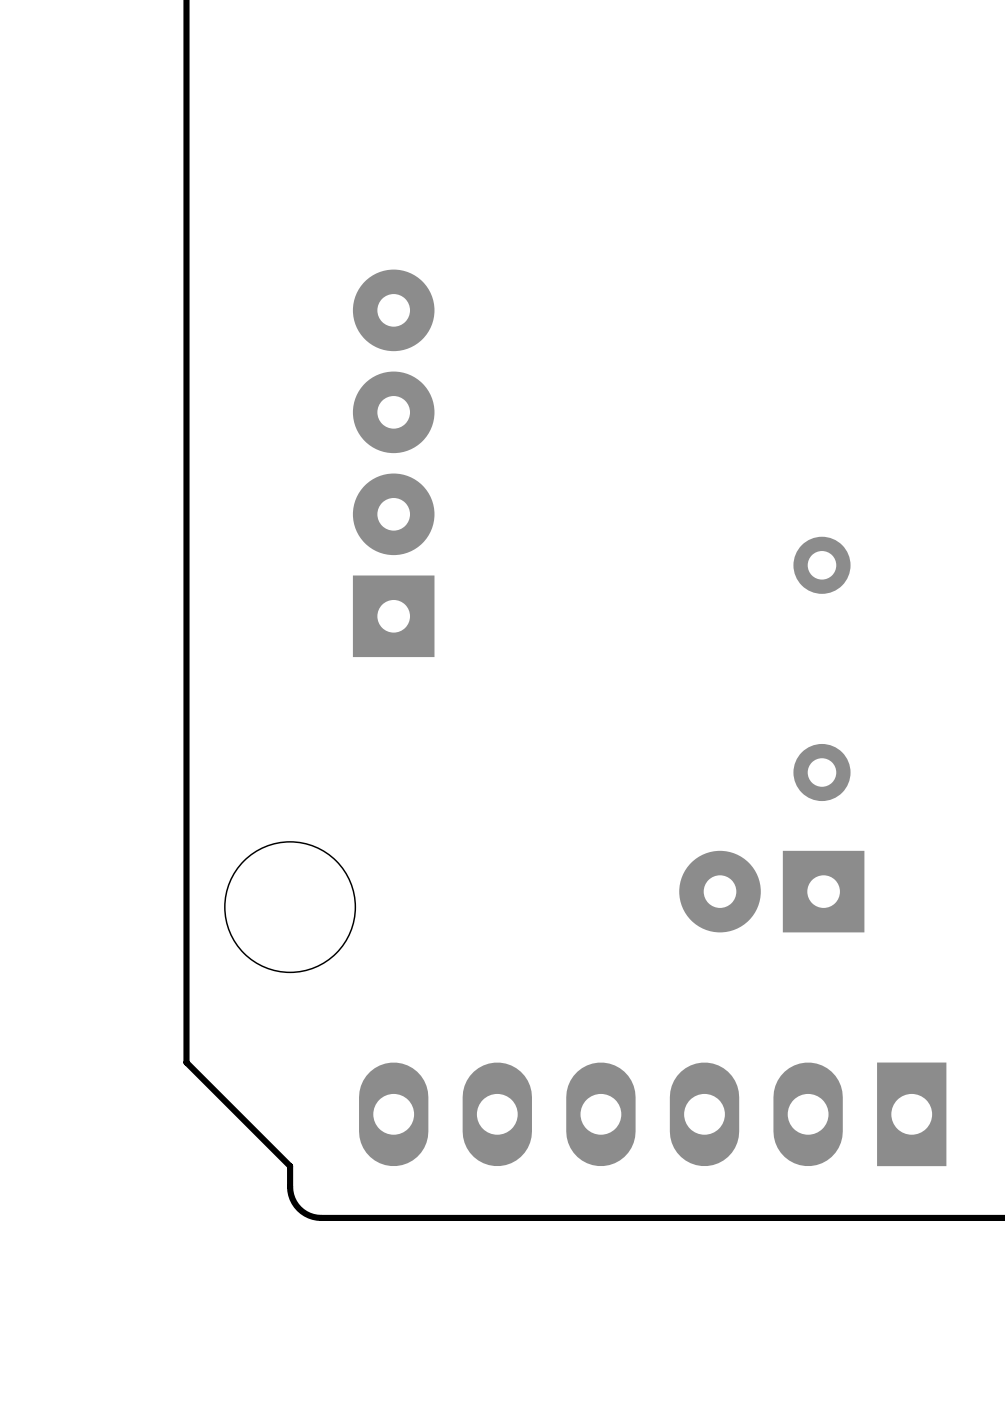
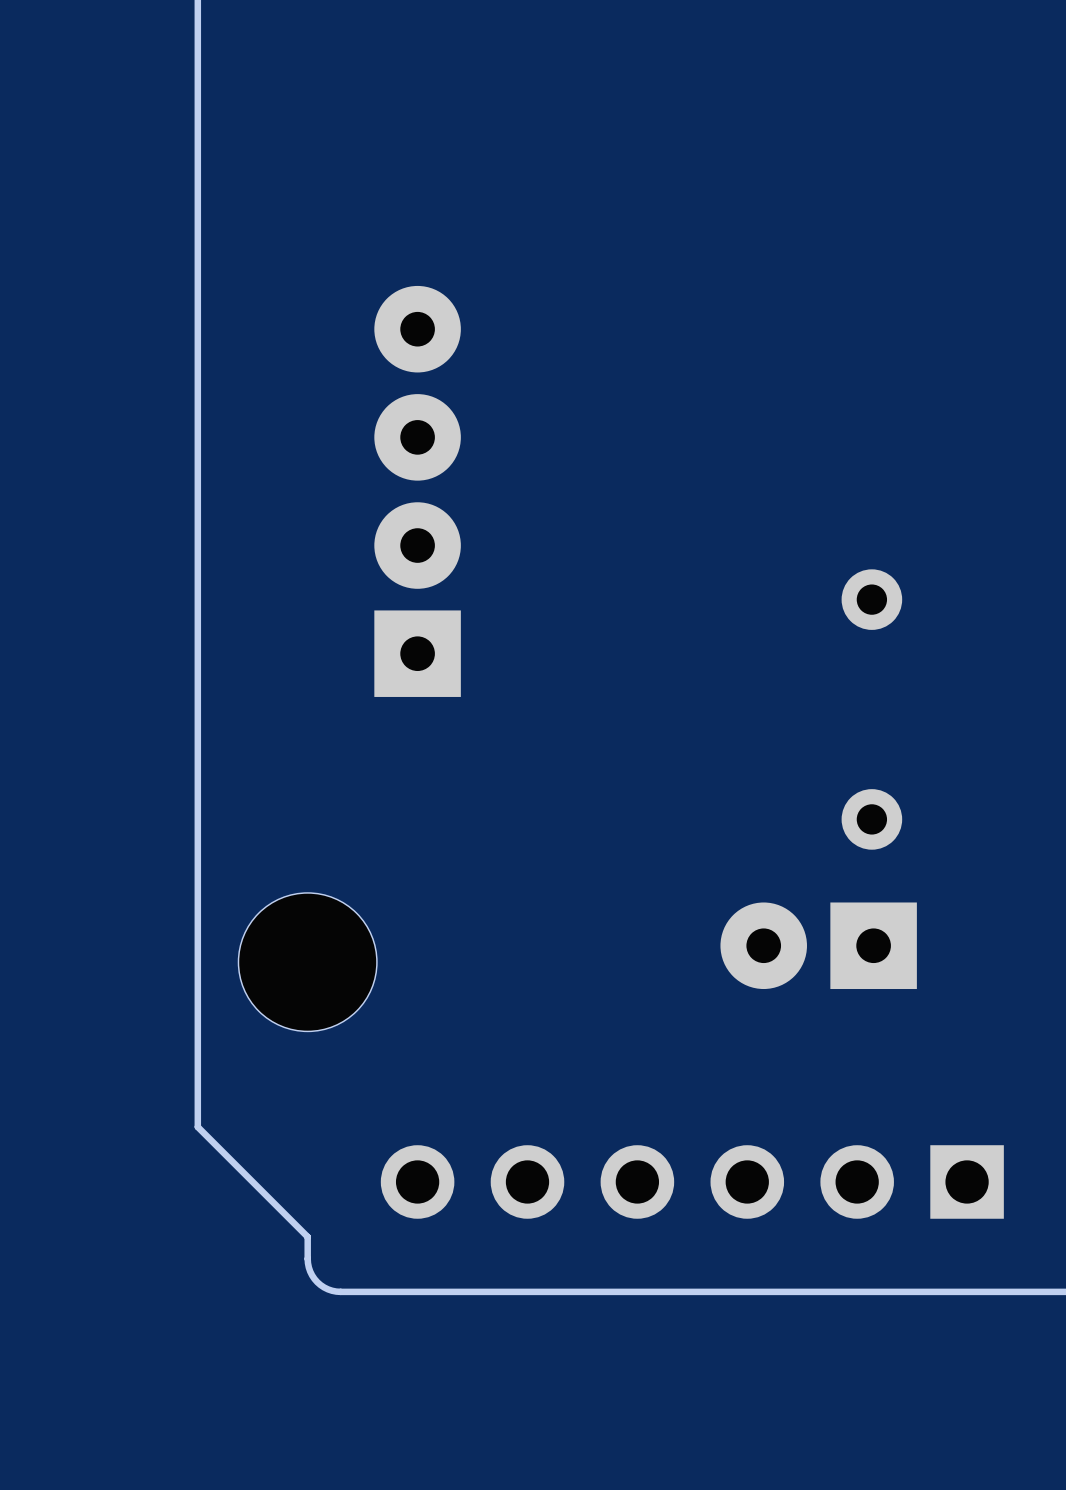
part footprint: [359, 1062, 947, 1167] -> [380, 1145, 1004, 1219]

